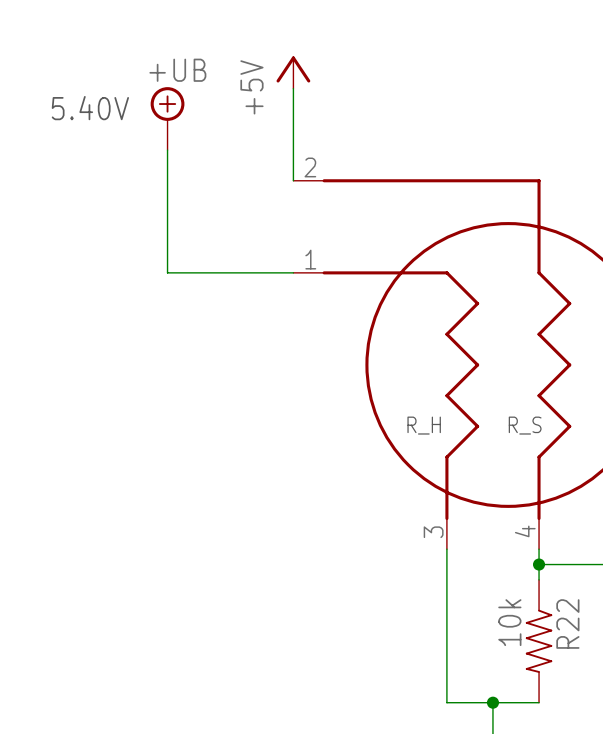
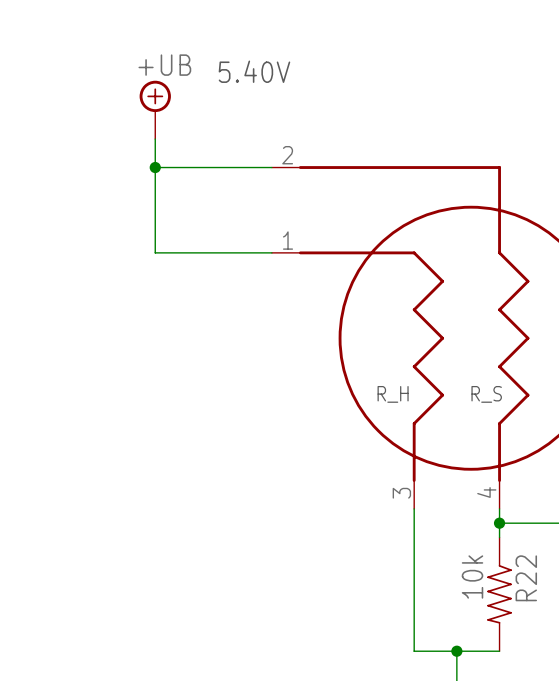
power symbol: +5V (293, 72) -> none
wire: (293, 88) (293, 180) -> (155, 167) (271, 167)
text position: 5.40V (90, 108) -> 5.40V (254, 71)
junction: none -> (155, 167)

